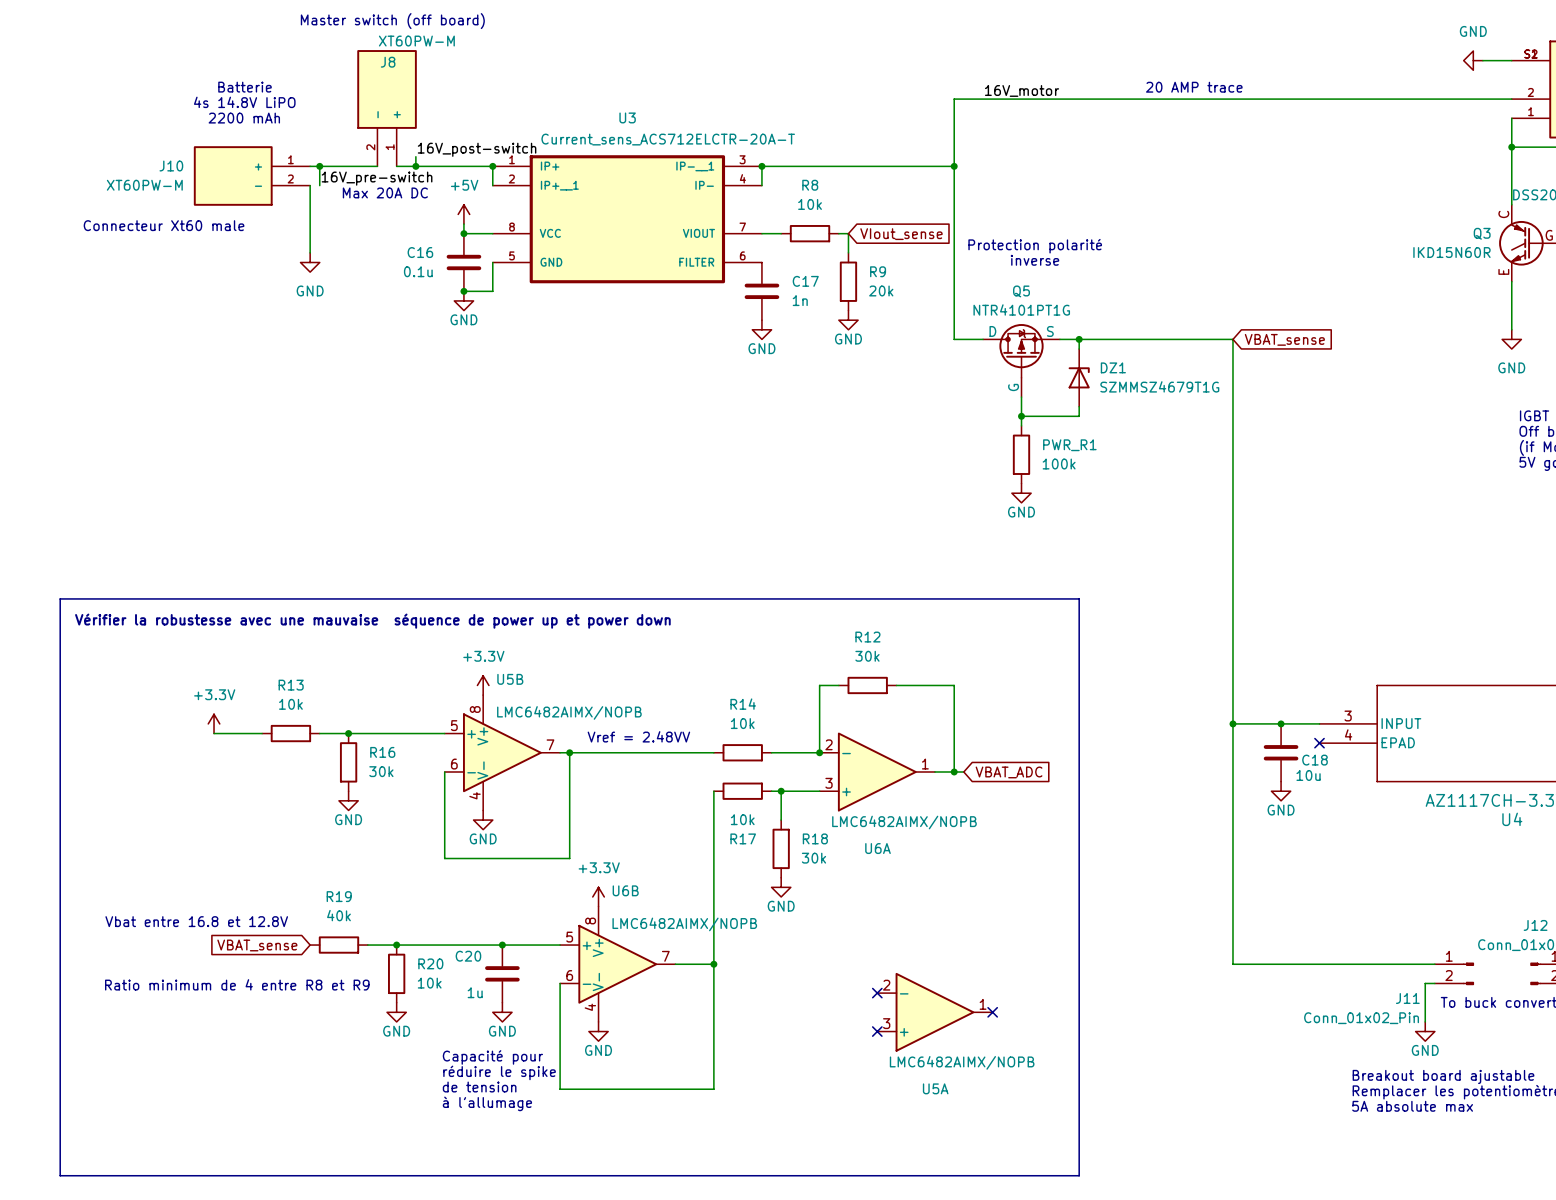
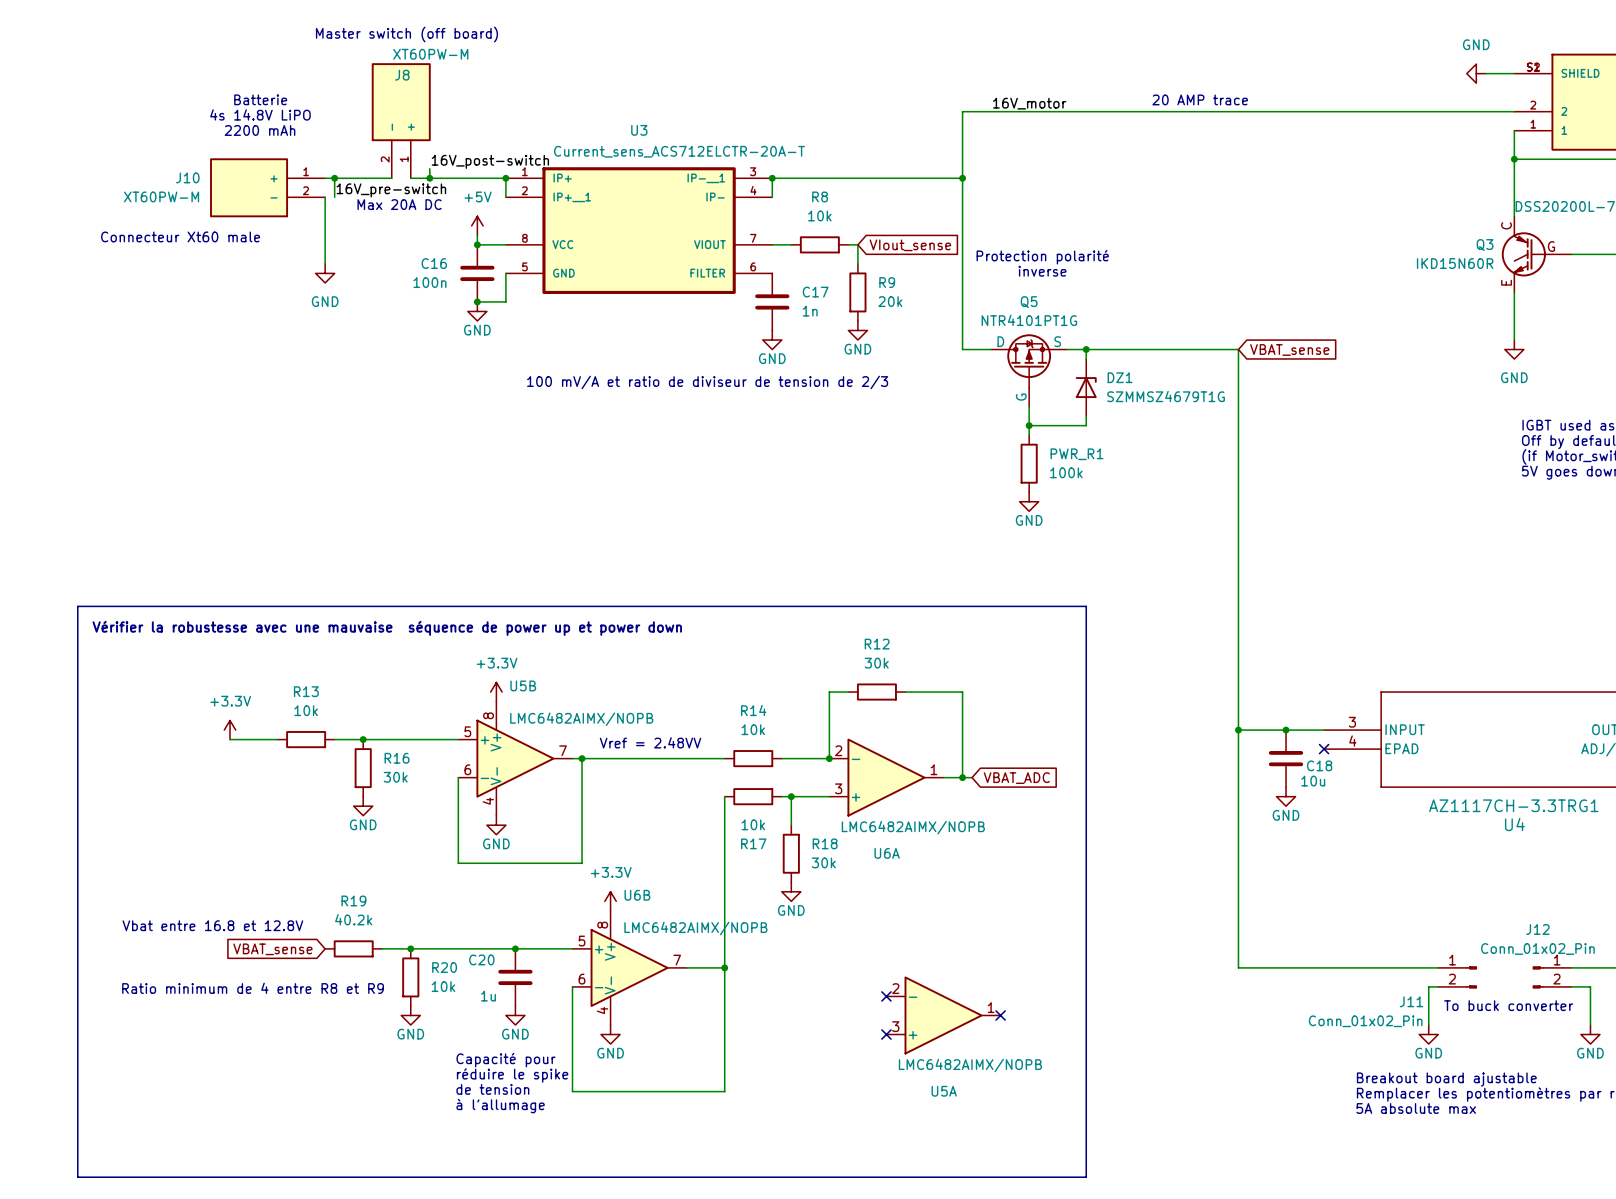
C16 value: 0.1u (418, 271) -> 100n (429, 282)
text: none -> 100 mV/A et ratio de diviseur de tension de 2/3 (707, 382)
R19 value: 40k (338, 915) -> 40.2k (353, 919)

